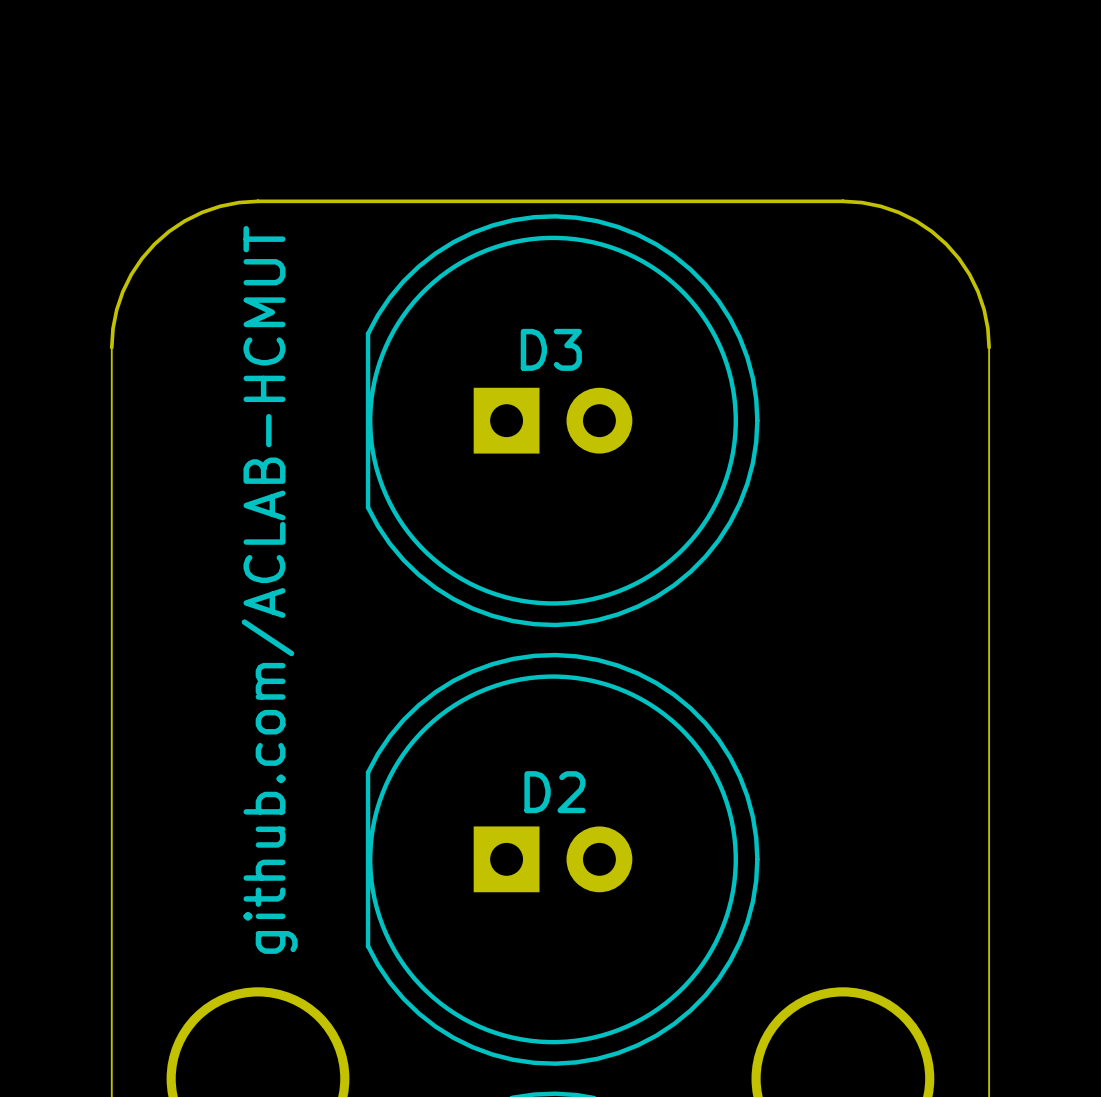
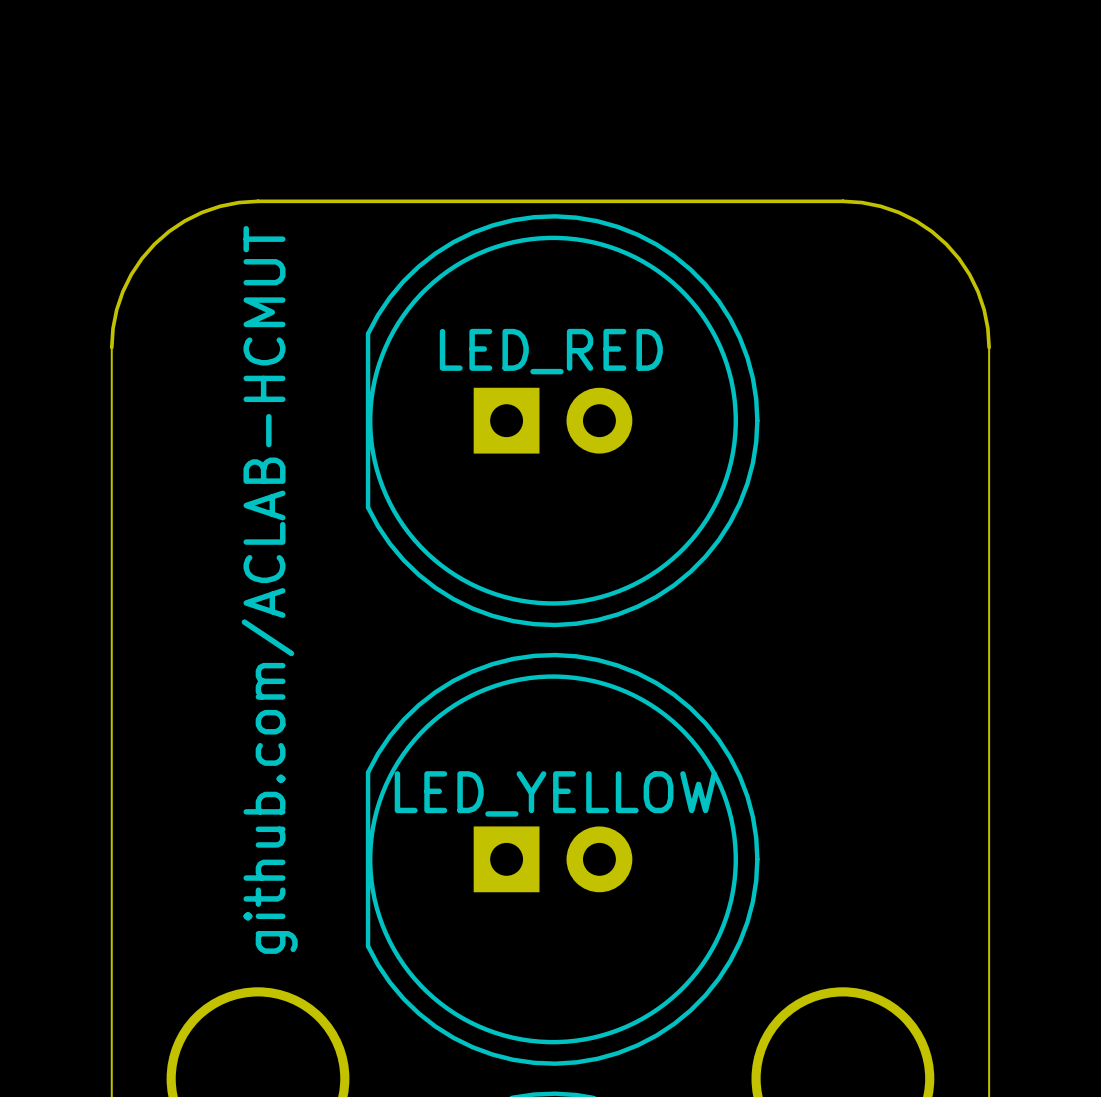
D3 name: D3 (551, 349) -> LED_RED (551, 351)
D2 name: D2 (554, 792) -> LED_YELLOW (555, 793)

